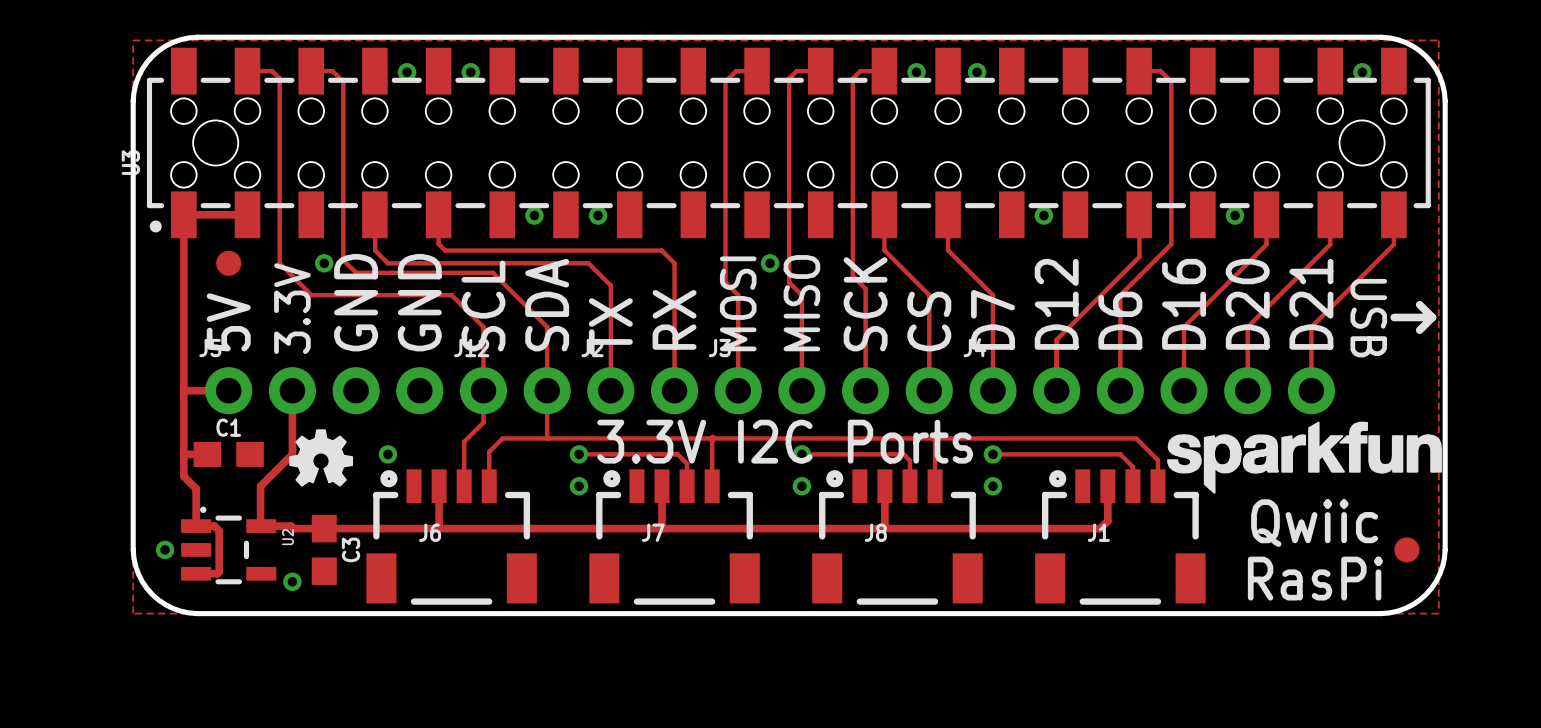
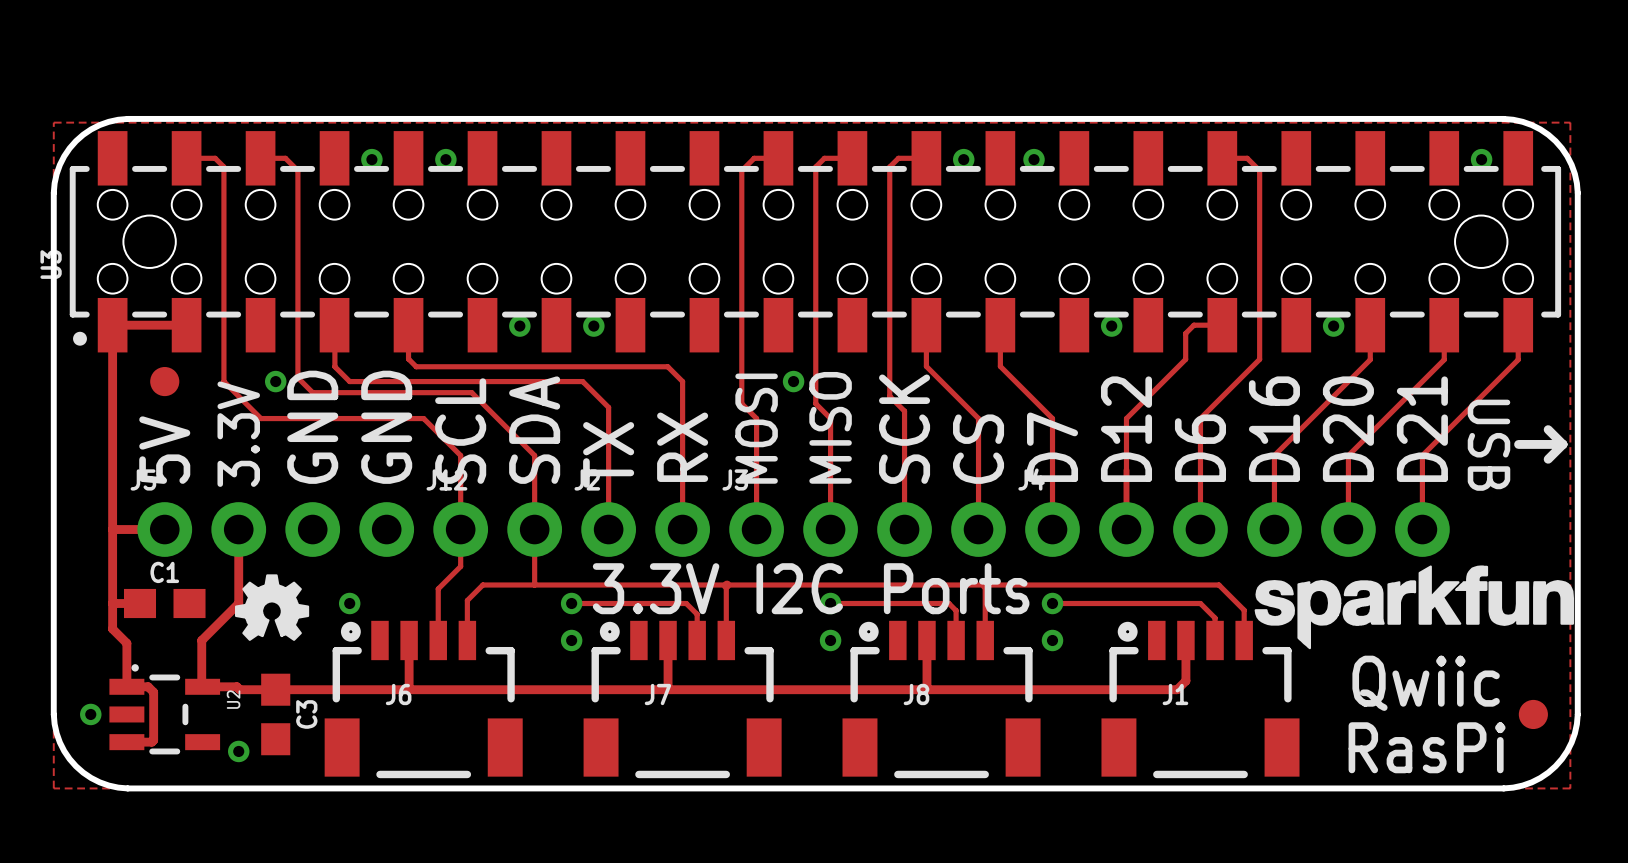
track: (1139, 215) (1139, 256) (1056, 339) -> (1222, 325) (1193, 325) (1185, 333) (1185, 359) (1126, 418) (1126, 470)

